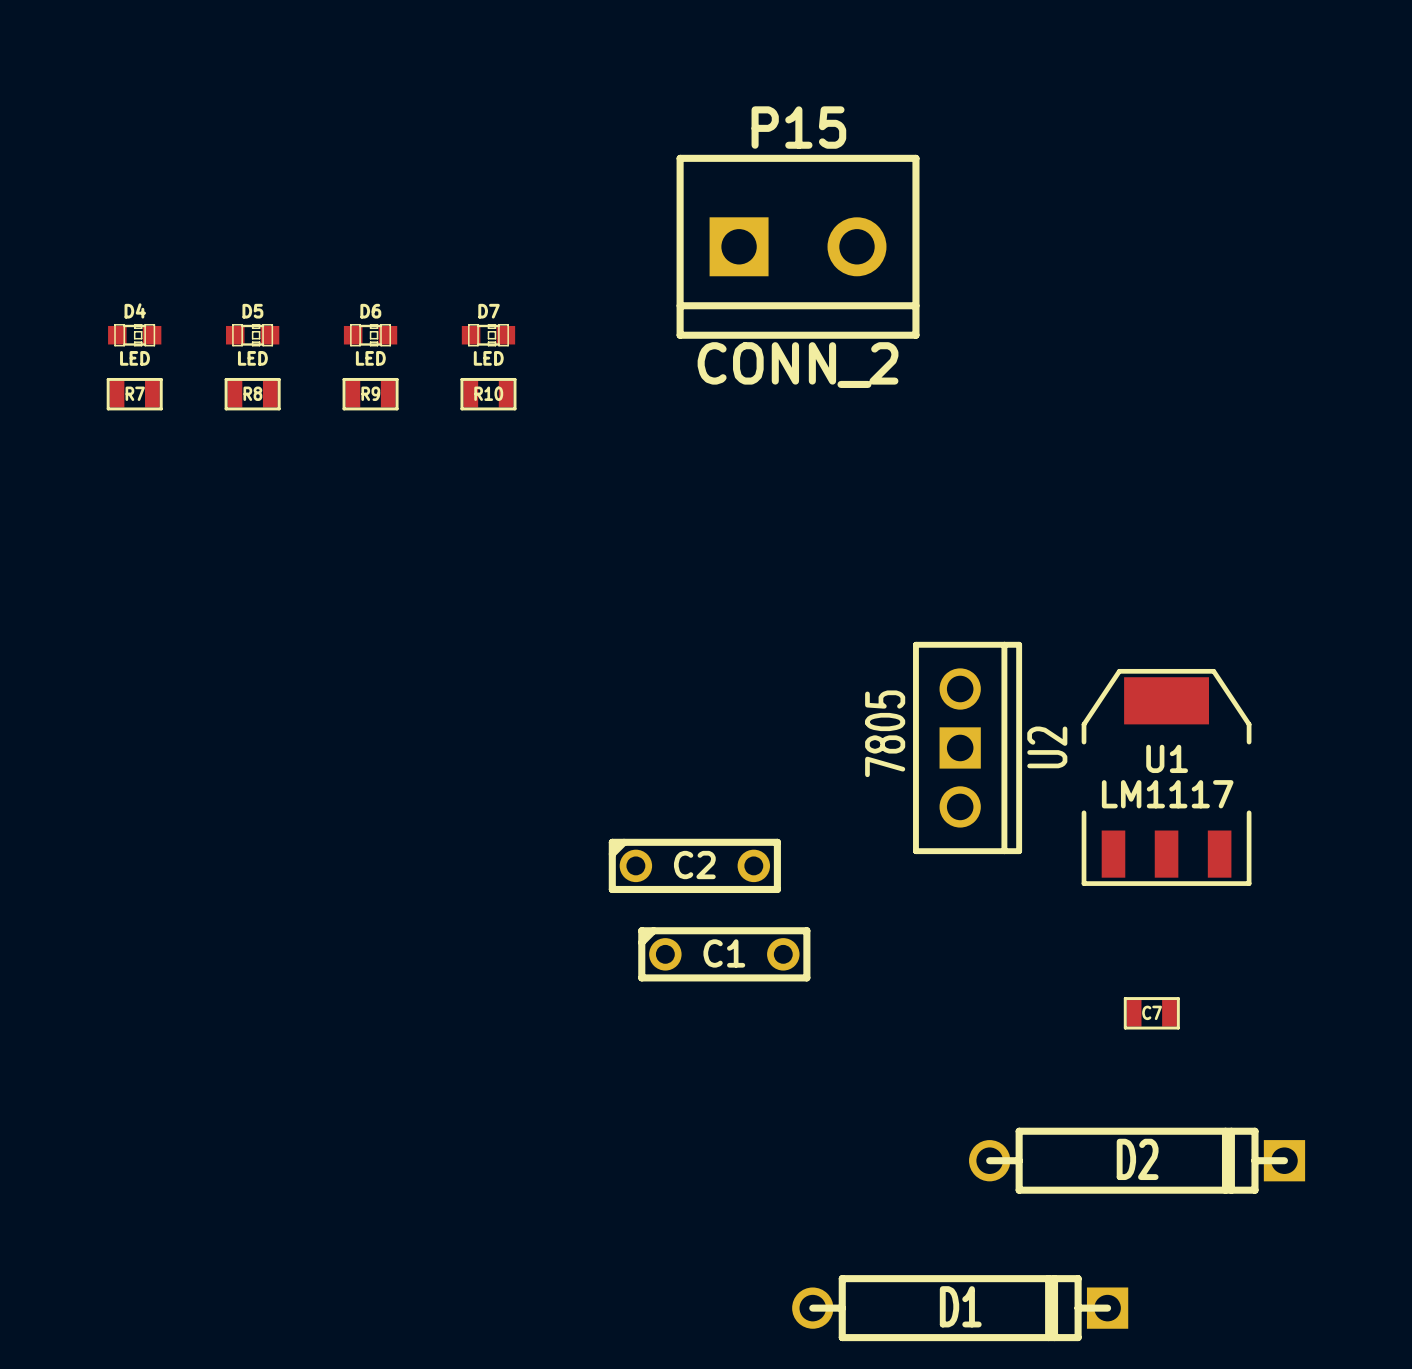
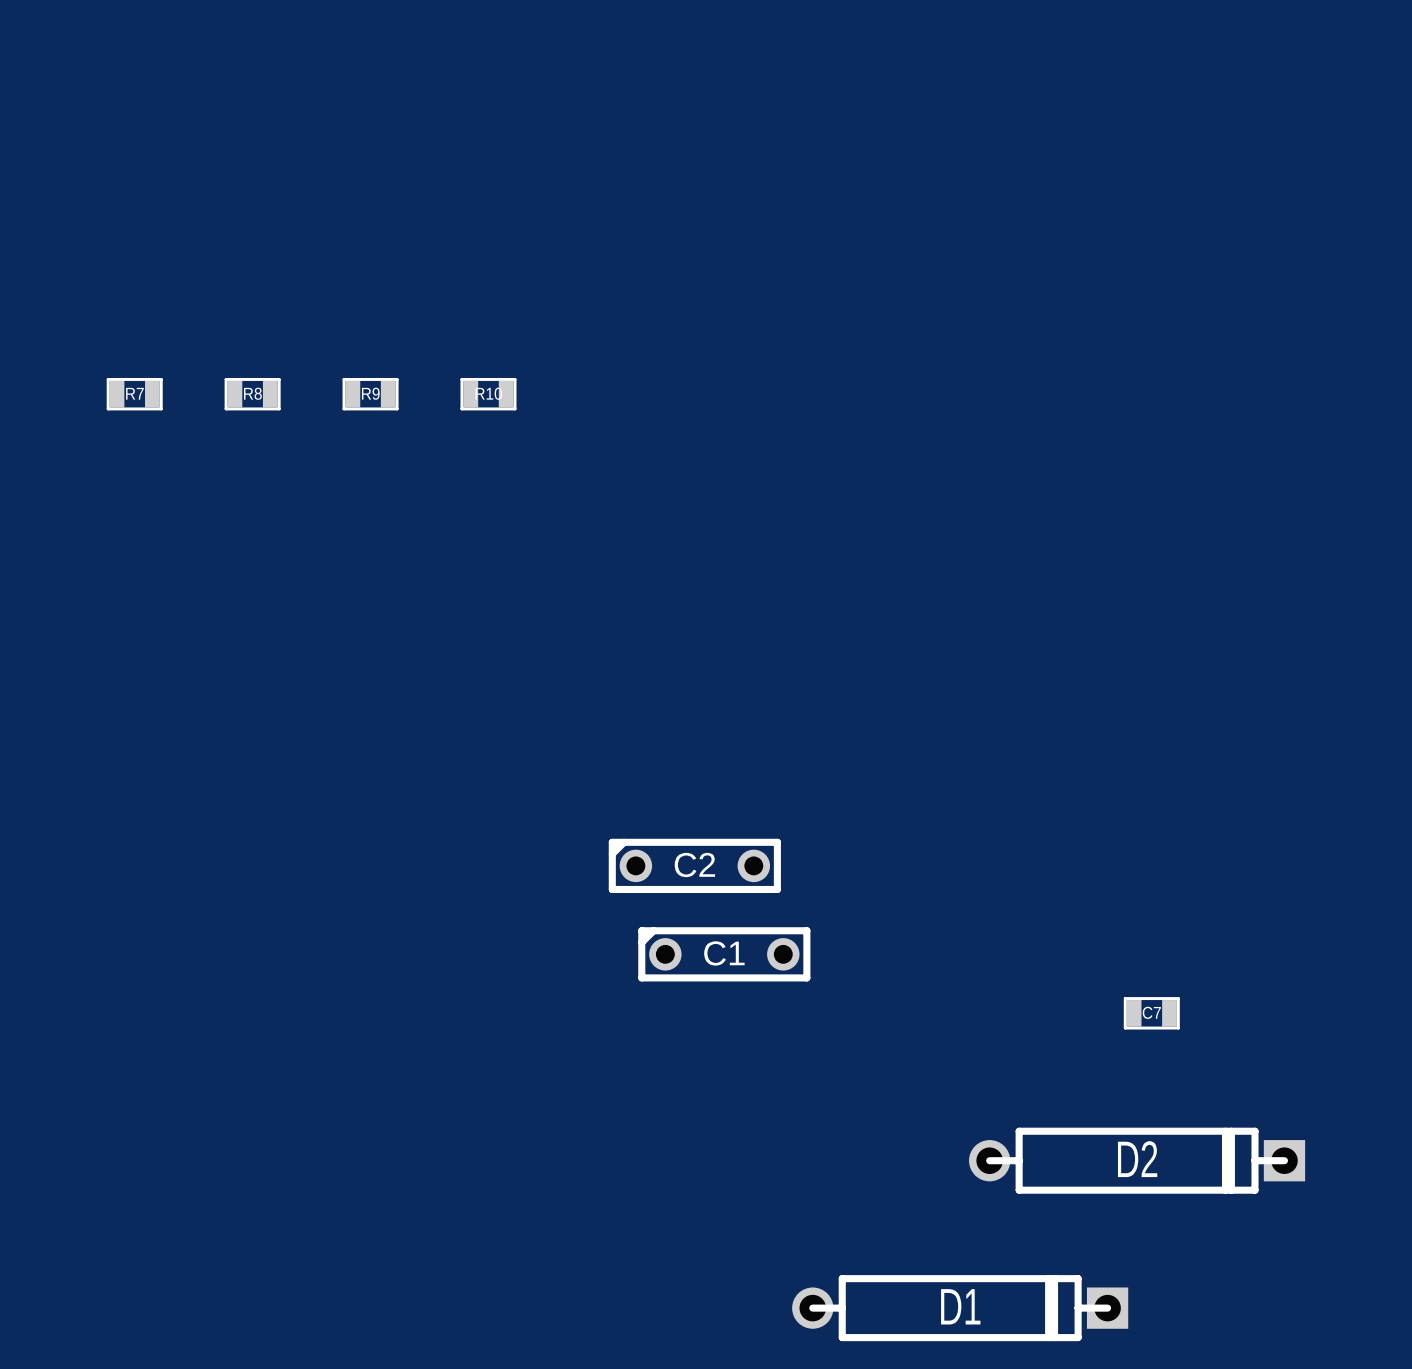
P15: CONN_2 (798, 246) -> none
D4: LED (134, 335) -> none
D5: LED (252, 335) -> none
D6: LED (370, 335) -> none
D7: LED (488, 335) -> none
U2: 7805 (967, 747) -> none
U1: LM1117 (1166, 777) -> none

